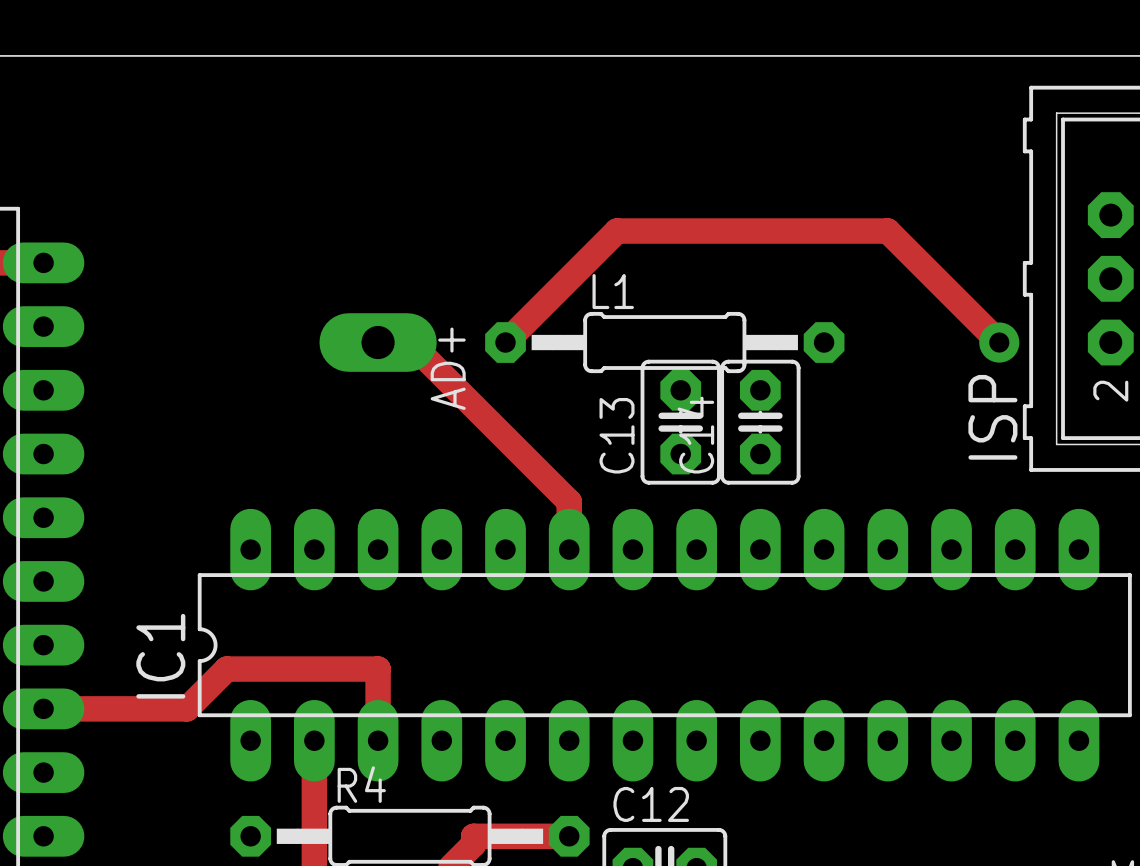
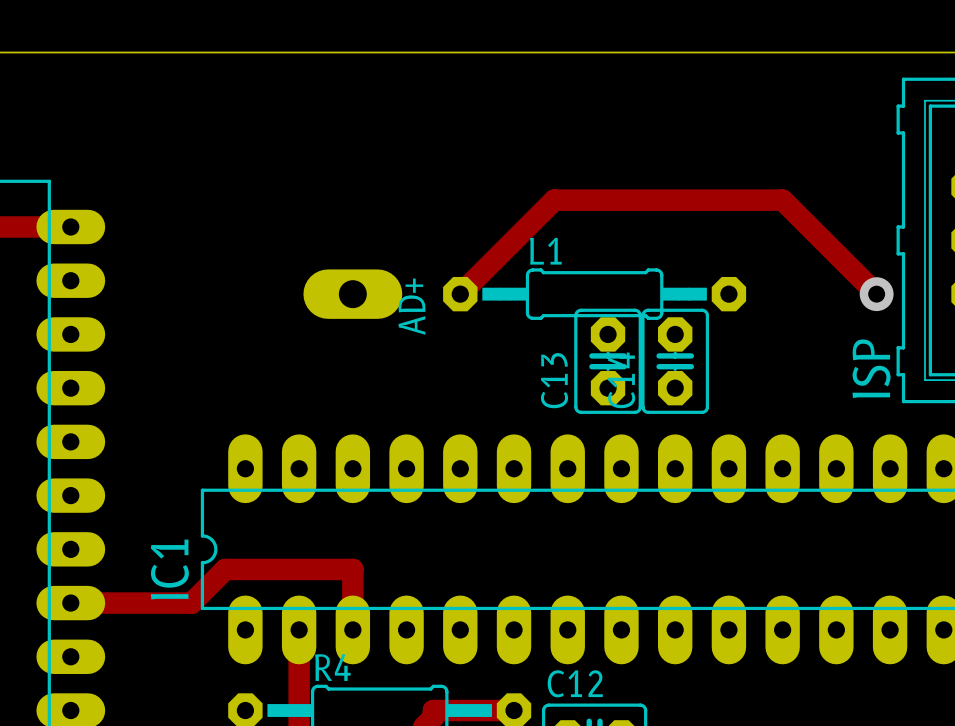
track: (378, 342) (394, 326) (569, 501) (569, 549) -> none

